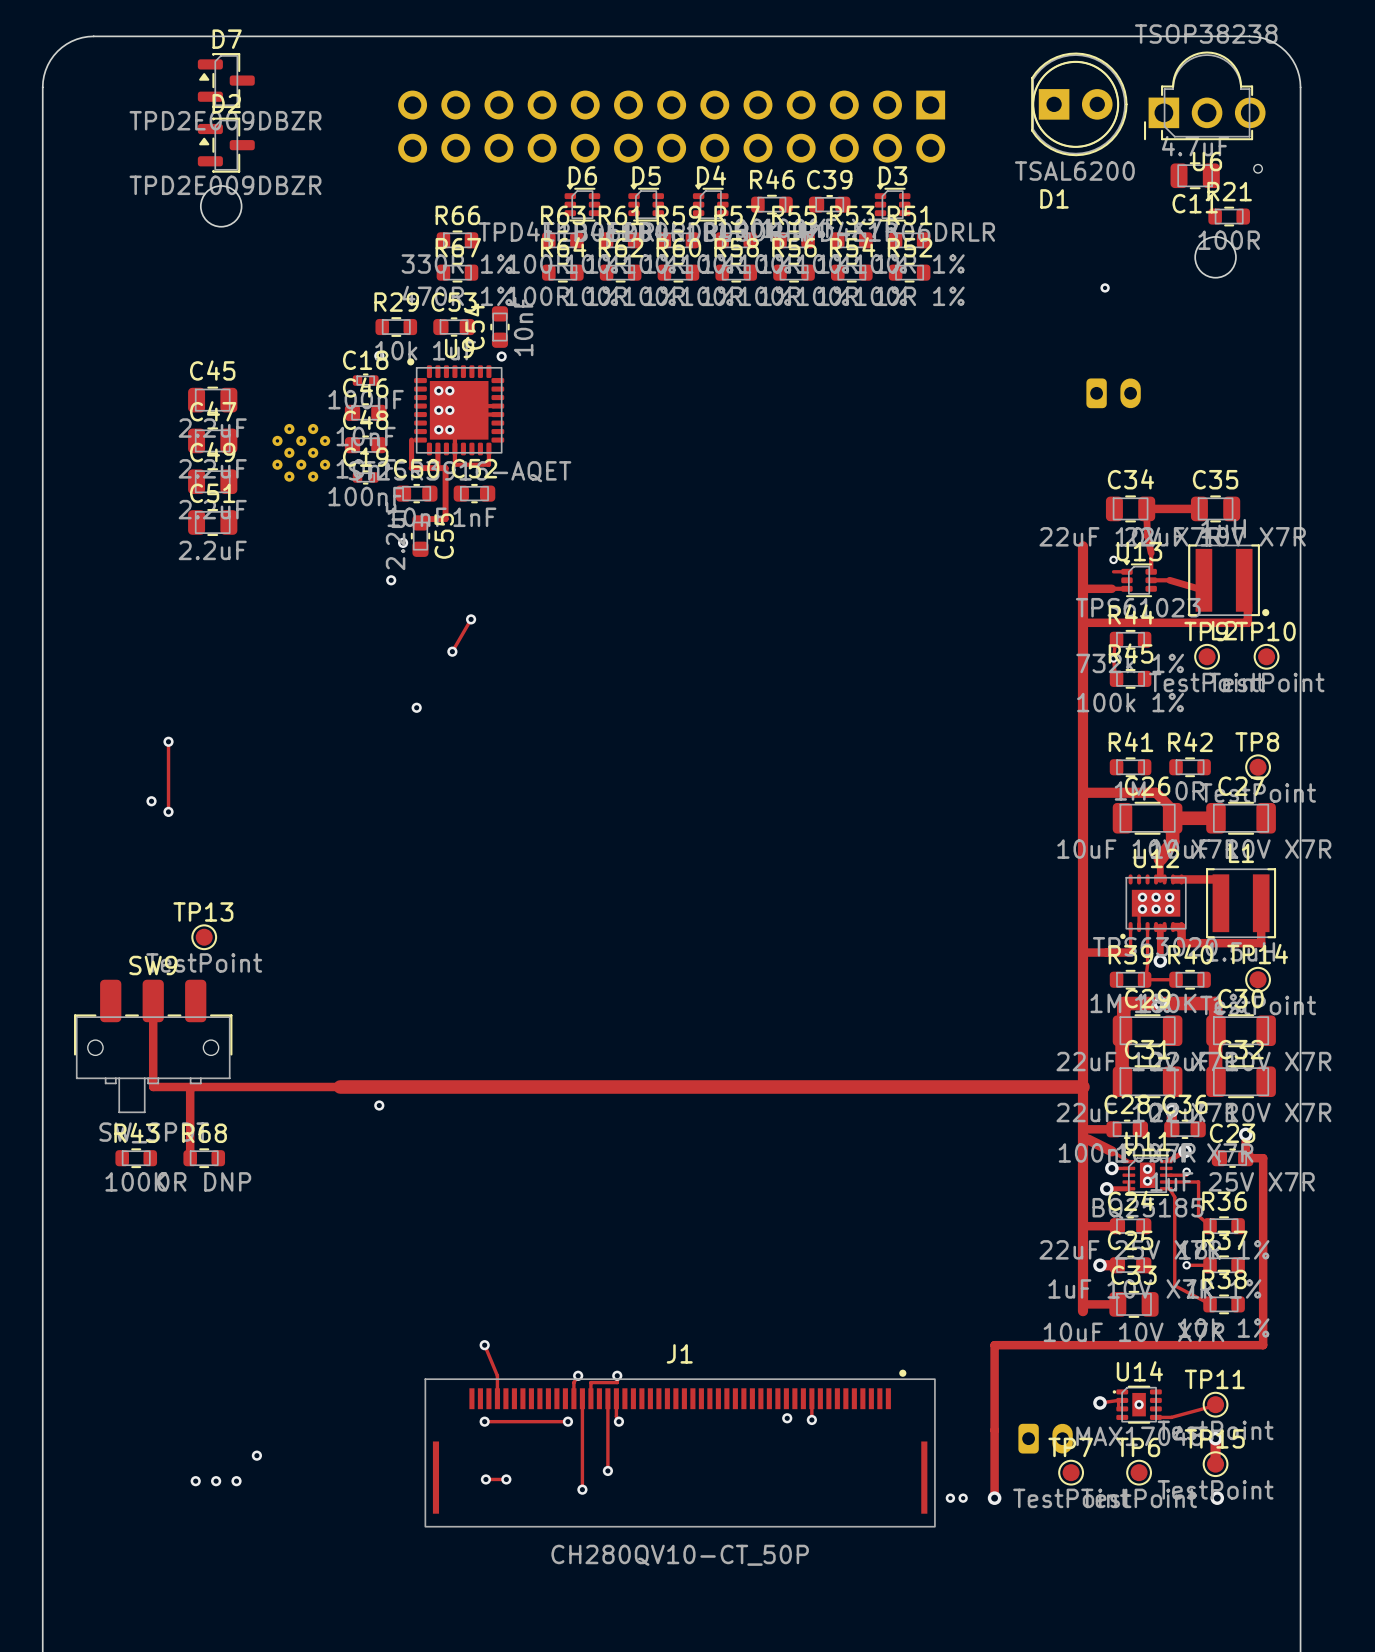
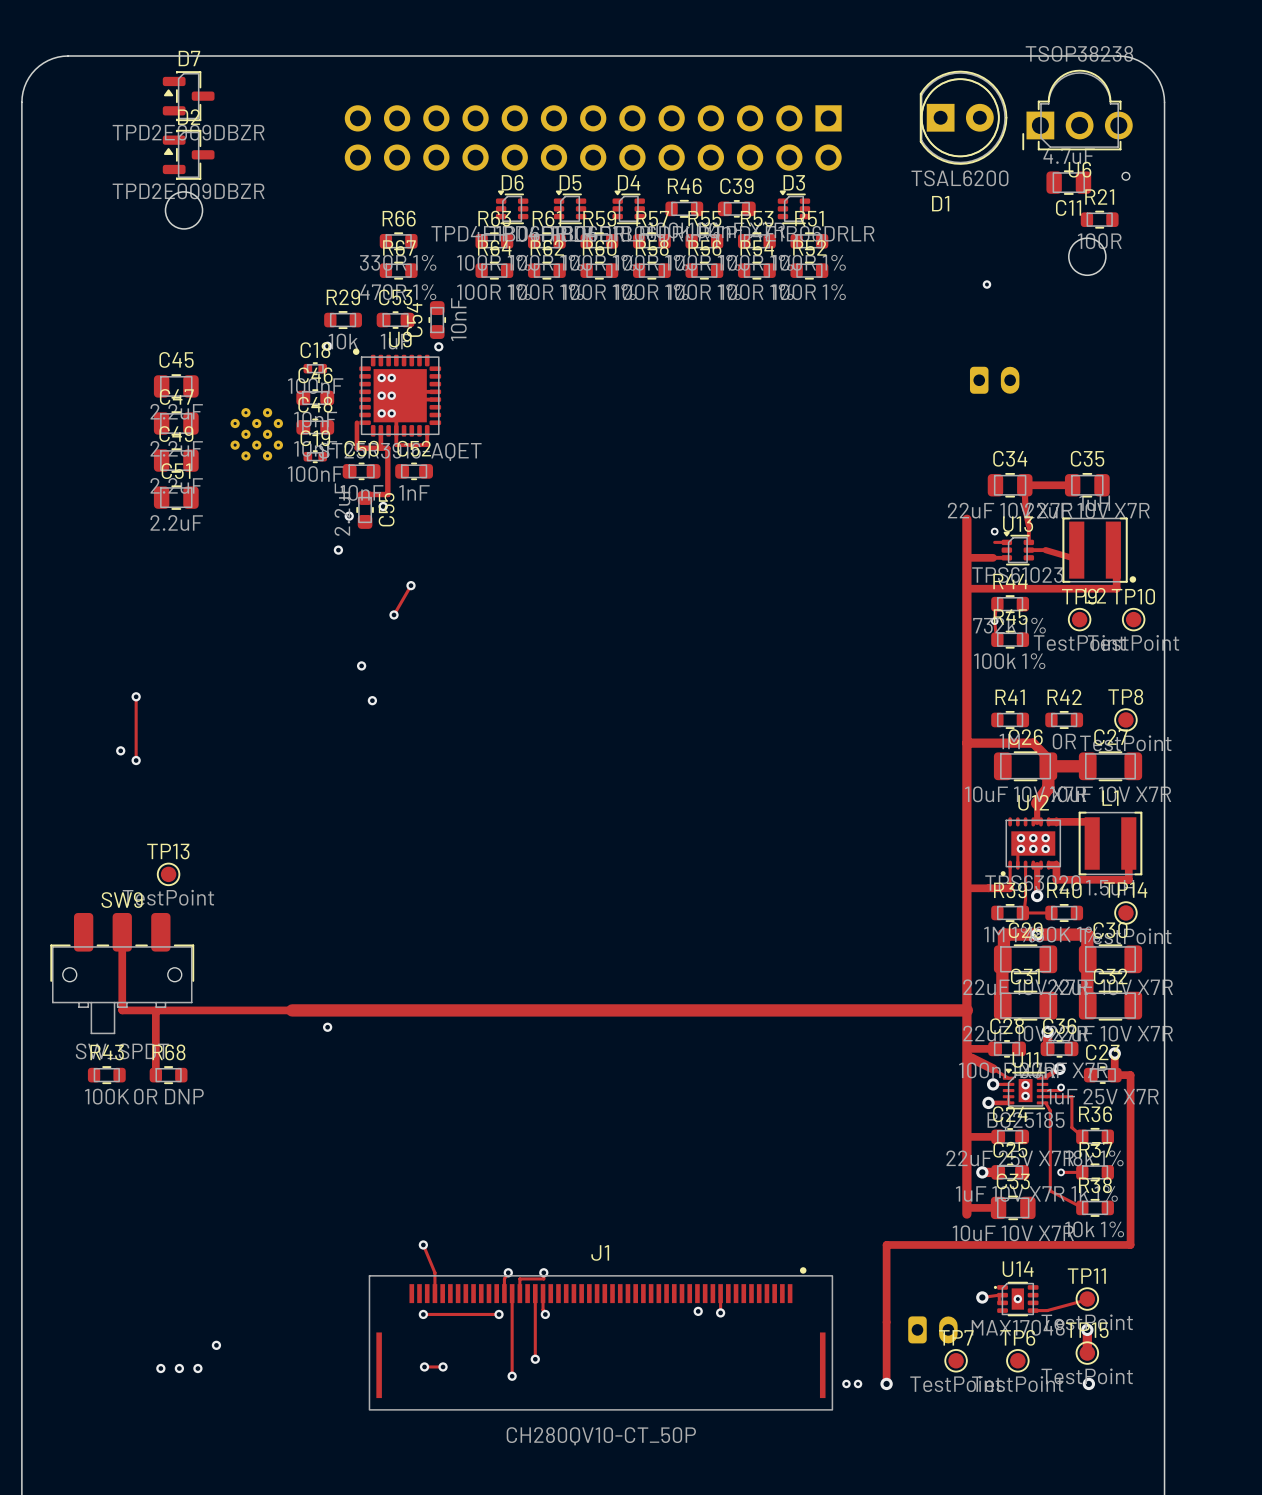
via: none -> (383, 506)
via: none -> (372, 700)

